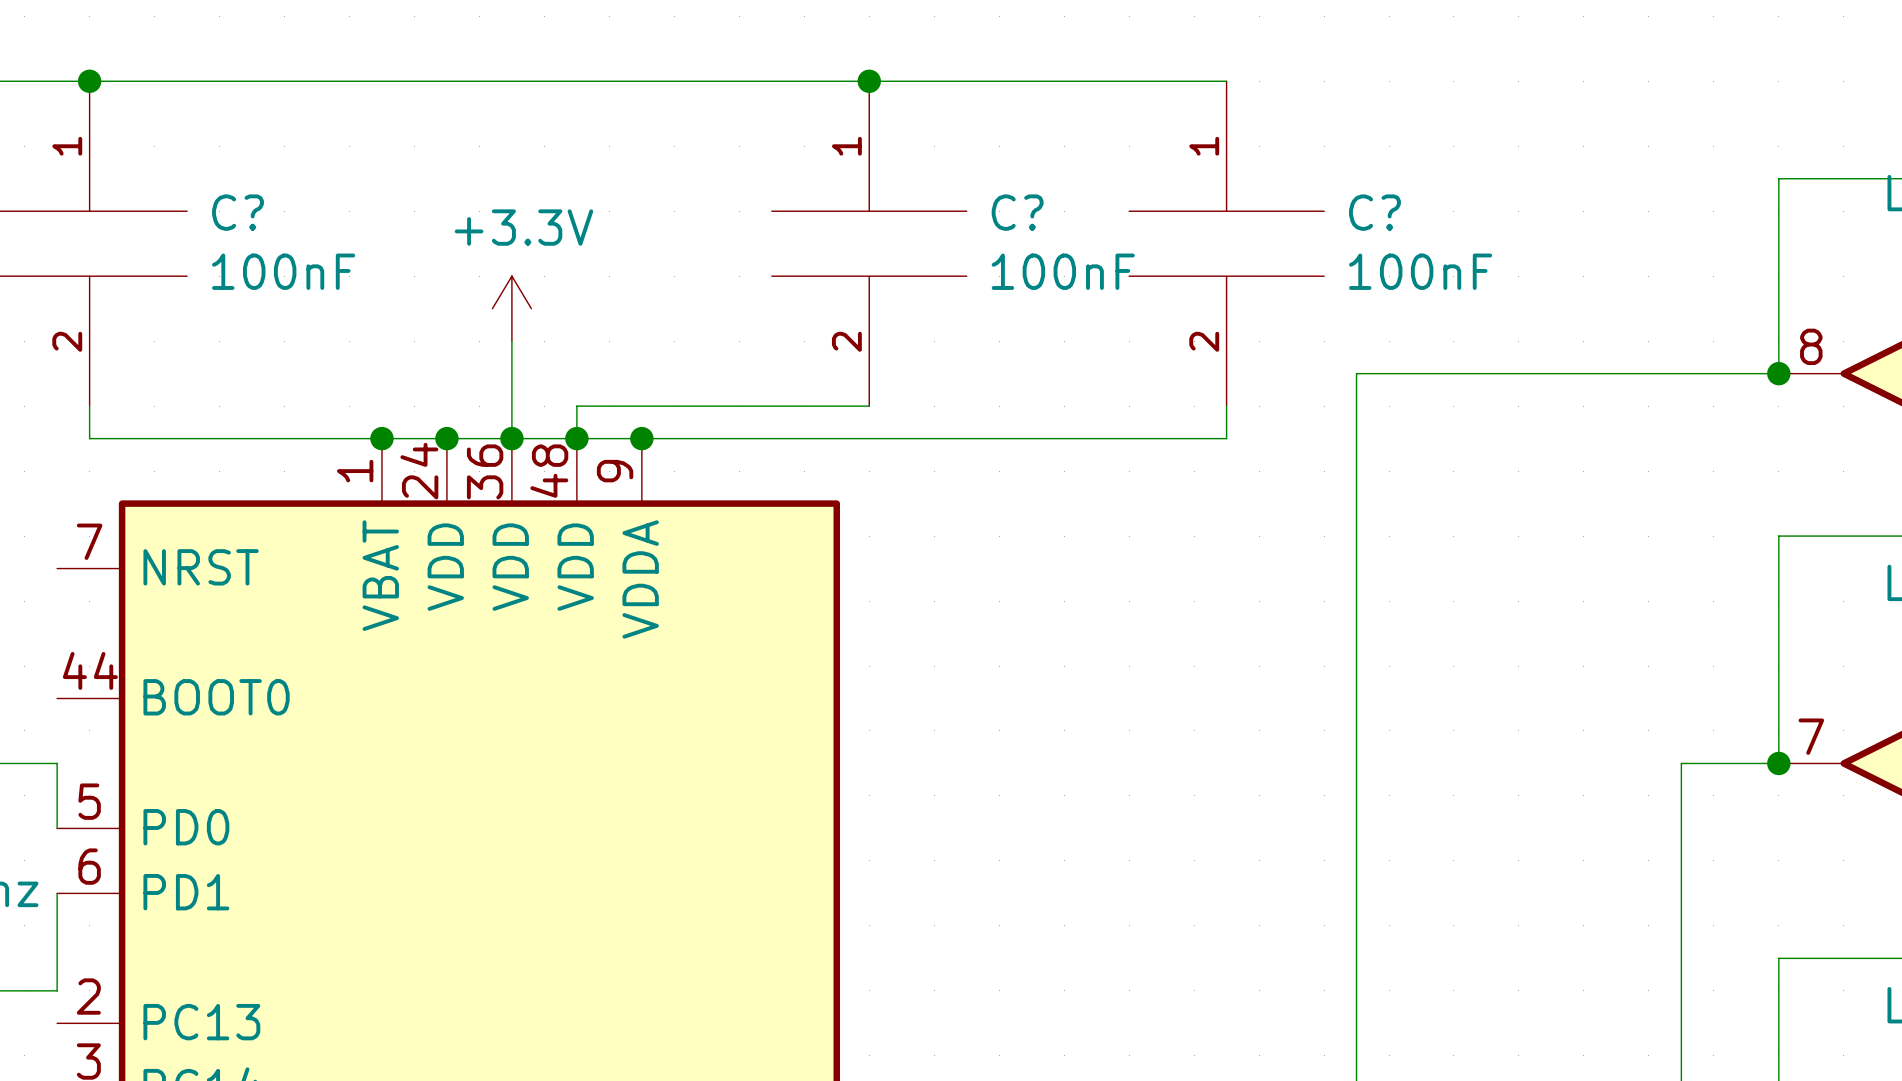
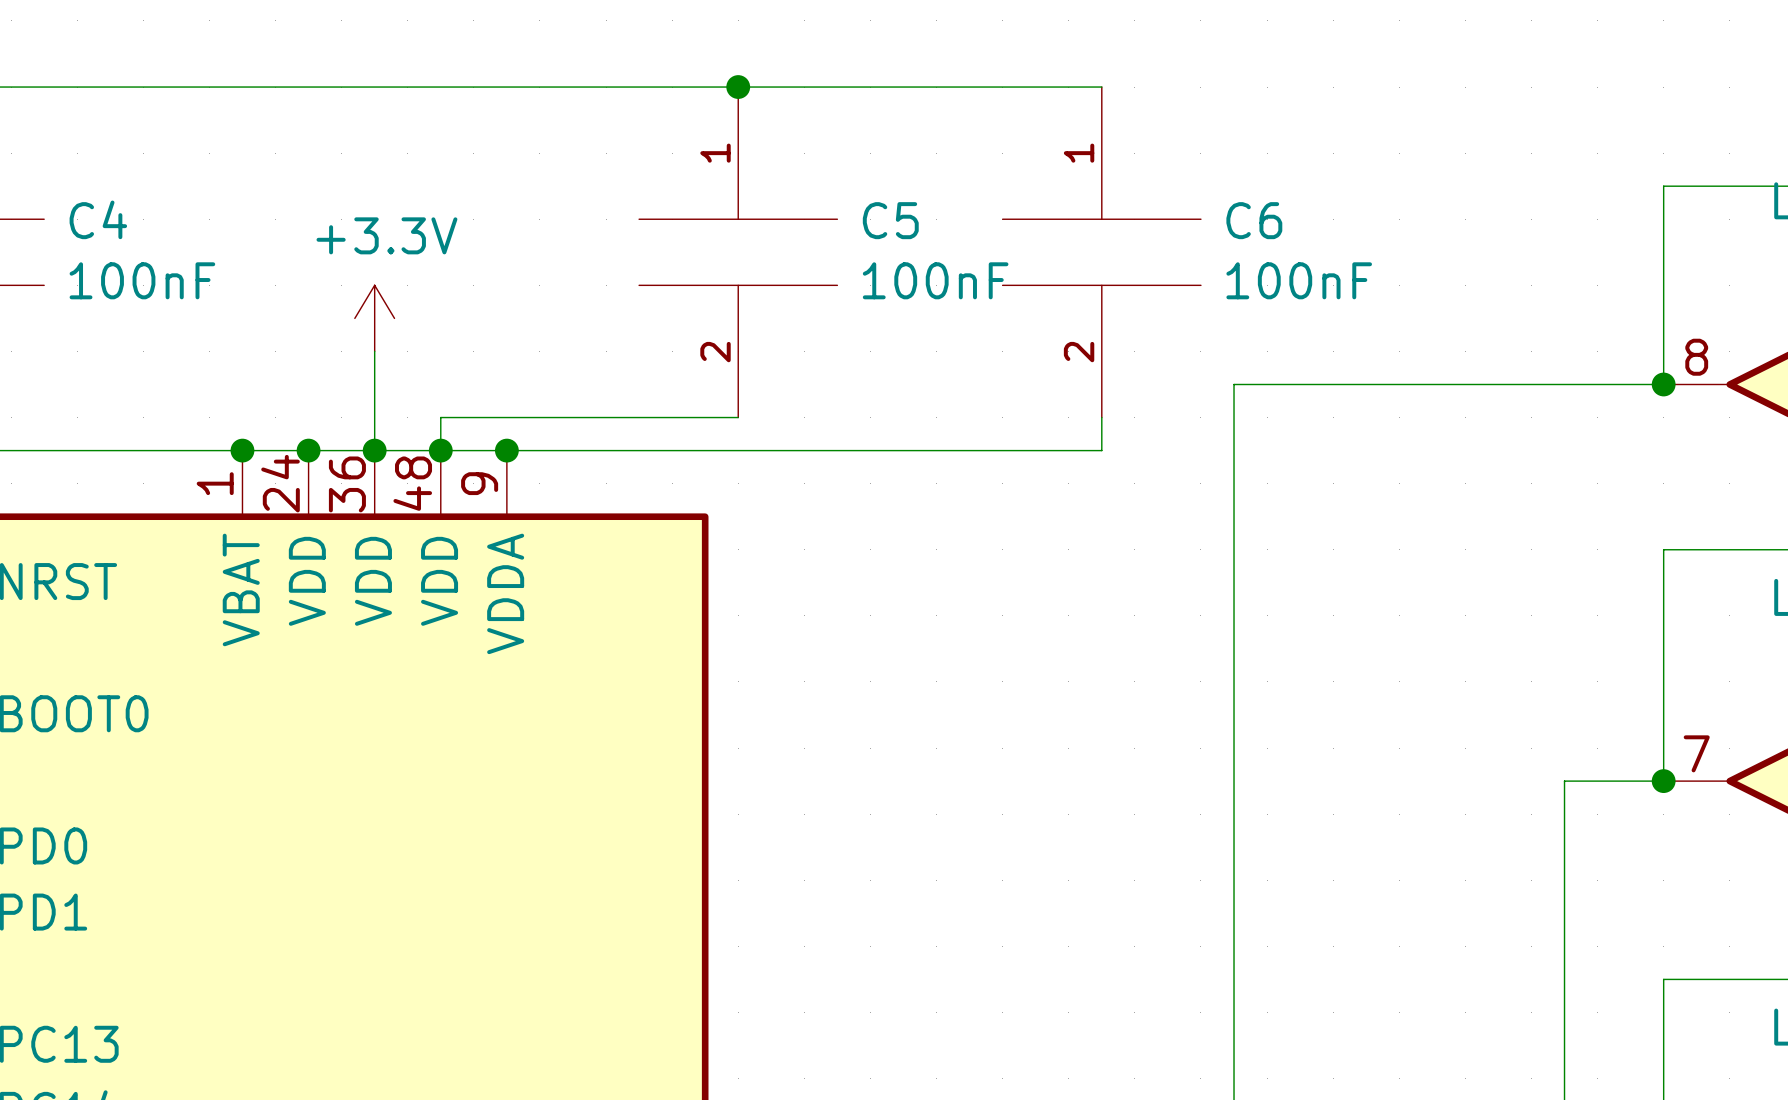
C? name: C? (237, 212) -> C4 (98, 219)
C? name: C? (1017, 212) -> C5 (890, 220)
C? name: C? (1374, 212) -> C6 (1254, 220)

